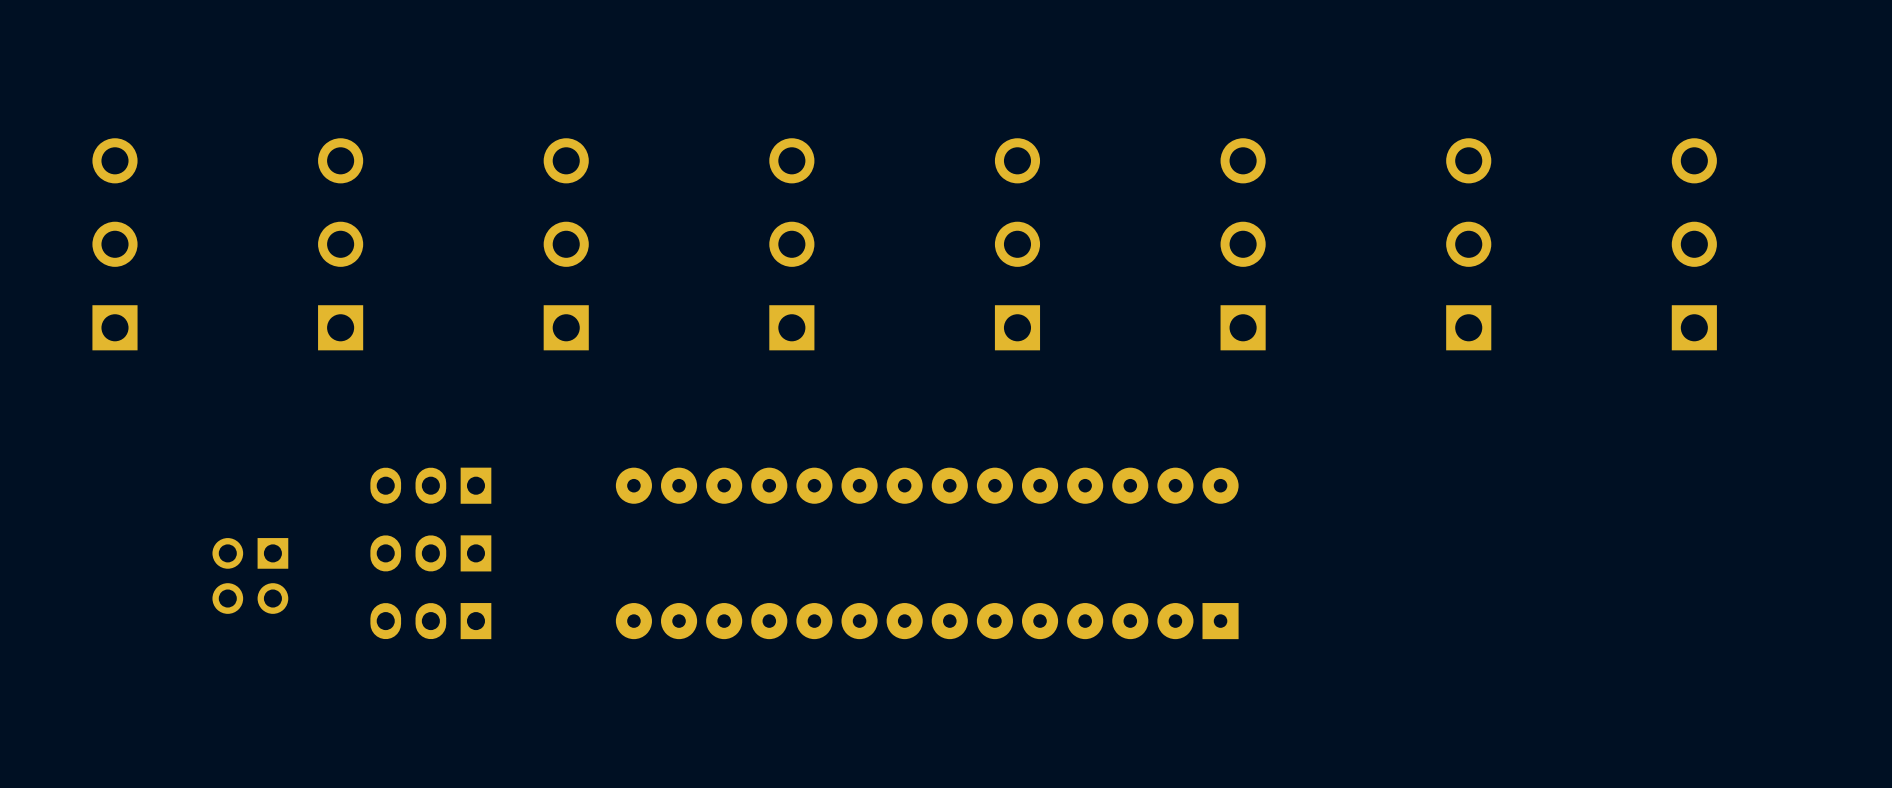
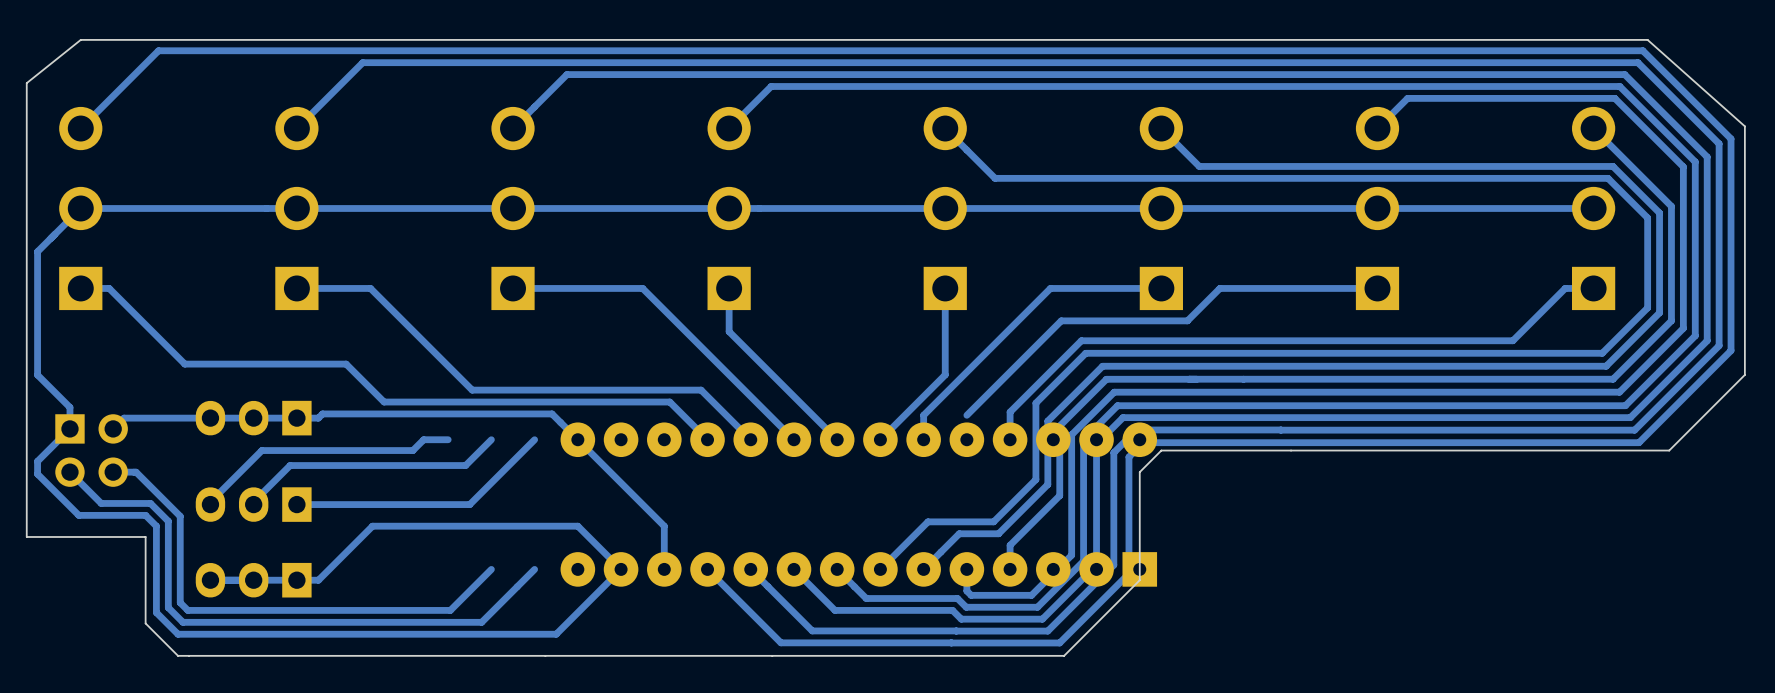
board edge: none -> (1647, 39) (80, 39) (26, 83) (26, 536) (145, 536) (145, 623) (178, 655) (1064, 655) (1139, 580) (1139, 472) (1161, 450) (1669, 450) (1744, 374) (1744, 126) (1647, 39)
track: none -> (80, 128) (158, 50) (1642, 50) (1731, 138) (1731, 350) (1639, 442) (1143, 442) (1128, 457) (1128, 573) (1059, 642) (780, 642) (707, 569)
track: none -> (296, 128) (362, 62) (1637, 62) (1719, 143) (1719, 345) (1634, 430) (1281, 430)
track: none -> (513, 128) (566, 74) (1624, 74) (1707, 157) (1707, 340) (1630, 417) (1122, 417) (1096, 444) (1096, 565) (1042, 619) (961, 619) (952, 610) (834, 610) (793, 569)
track: none -> (729, 128) (771, 86) (1619, 86) (1695, 161) (1695, 335) (1625, 405) (1117, 405) (1083, 439) (1083, 561) (1037, 607) (966, 607) (957, 598) (866, 598) (837, 569)
track: none -> (945, 128) (995, 178) (1608, 178) (1647, 217) (1647, 307) (1602, 353) (1085, 353) (1035, 403) (1035, 479) (993, 521) (927, 521) (880, 569)
track: none -> (1161, 128) (1199, 166) (1613, 166) (1659, 213) (1659, 312) (1606, 366) (1102, 366) (1047, 421) (1047, 484) (998, 533) (959, 533) (923, 569)
track: none -> (1377, 128) (1407, 98) (1614, 98) (1683, 166) (1683, 328) (1619, 392) (1114, 392) (1071, 434) (1071, 555) (1031, 595) (971, 595) (966, 591) (966, 569)
track: none -> (1593, 128) (1671, 206) (1671, 320) (1613, 379) (1189, 379)
track: none -> (1593, 208) (80, 208) (37, 251) (37, 375) (69, 407) (69, 428) (37, 461) (37, 474) (78, 515) (145, 515) (156, 526) (156, 612) (178, 634) (556, 634) (621, 569) (577, 526) (372, 526) (318, 580) (210, 580)
track: none -> (80, 288) (109, 288) (184, 364) (346, 364) (384, 402) (669, 402) (707, 439)
track: none -> (296, 288) (370, 288) (472, 390) (701, 390) (750, 439)
track: none -> (513, 288) (642, 288) (793, 439)
track: none -> (729, 288) (729, 331) (837, 439)
track: none -> (945, 288) (945, 374) (880, 439)
track: none -> (1161, 288) (1050, 288) (923, 415) (923, 439)
track: none -> (1377, 288) (1219, 288) (1187, 320) (1061, 320) (966, 415)
track: none -> (1593, 288) (1565, 288) (1512, 340) (1081, 340) (1010, 412) (1010, 439)
track: none -> (1189, 379) (1106, 379) (1059, 425) (1059, 495) (1010, 545) (1010, 569)
part: none -> (253, 418)
track: none -> (113, 428) (124, 418) (318, 418) (322, 413) (552, 413) (664, 526) (664, 569)
track: none -> (1280, 429) (1136, 429) (1113, 452) (1113, 565) (1047, 631) (812, 630) (750, 569)
part: (430, 485) -> none
track: none -> (448, 439) (423, 439) (412, 450) (261, 450) (210, 501) (210, 504)
track: none -> (491, 439) (465, 465) (290, 465) (253, 501) (253, 504)
track: none -> (534, 439) (469, 504) (296, 504) (299, 502)
track: none -> (69, 472) (101, 503) (150, 503) (168, 521) (168, 607) (182, 622) (481, 622) (534, 569)
track: none -> (113, 472) (136, 472) (180, 516) (180, 602) (187, 610) (450, 610) (491, 569)
part: none -> (253, 504)
part: (430, 553) -> none
part rotation: 0° (250, 575) -> 90° counterclockwise (91, 450)
part position: (250, 575) -> (91, 450)
part: (430, 621) -> none
part: none -> (253, 580)

